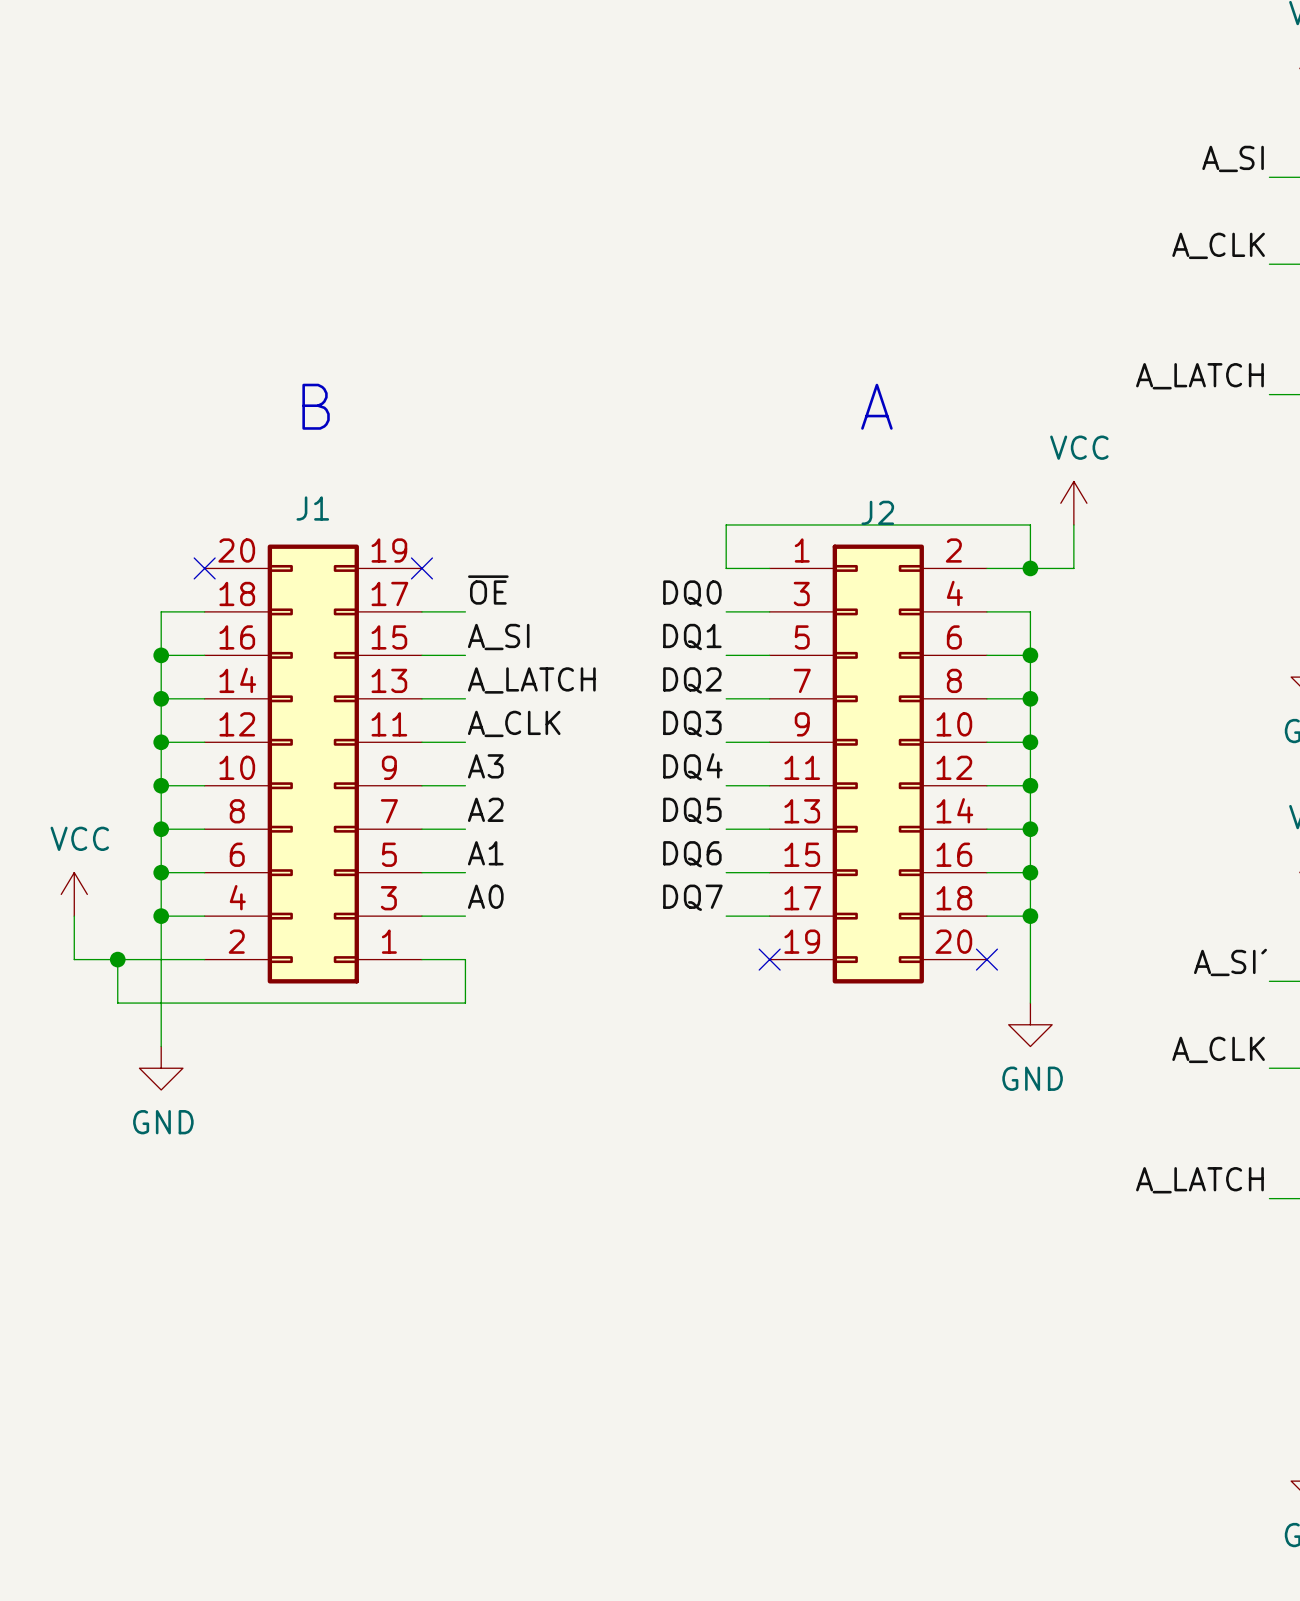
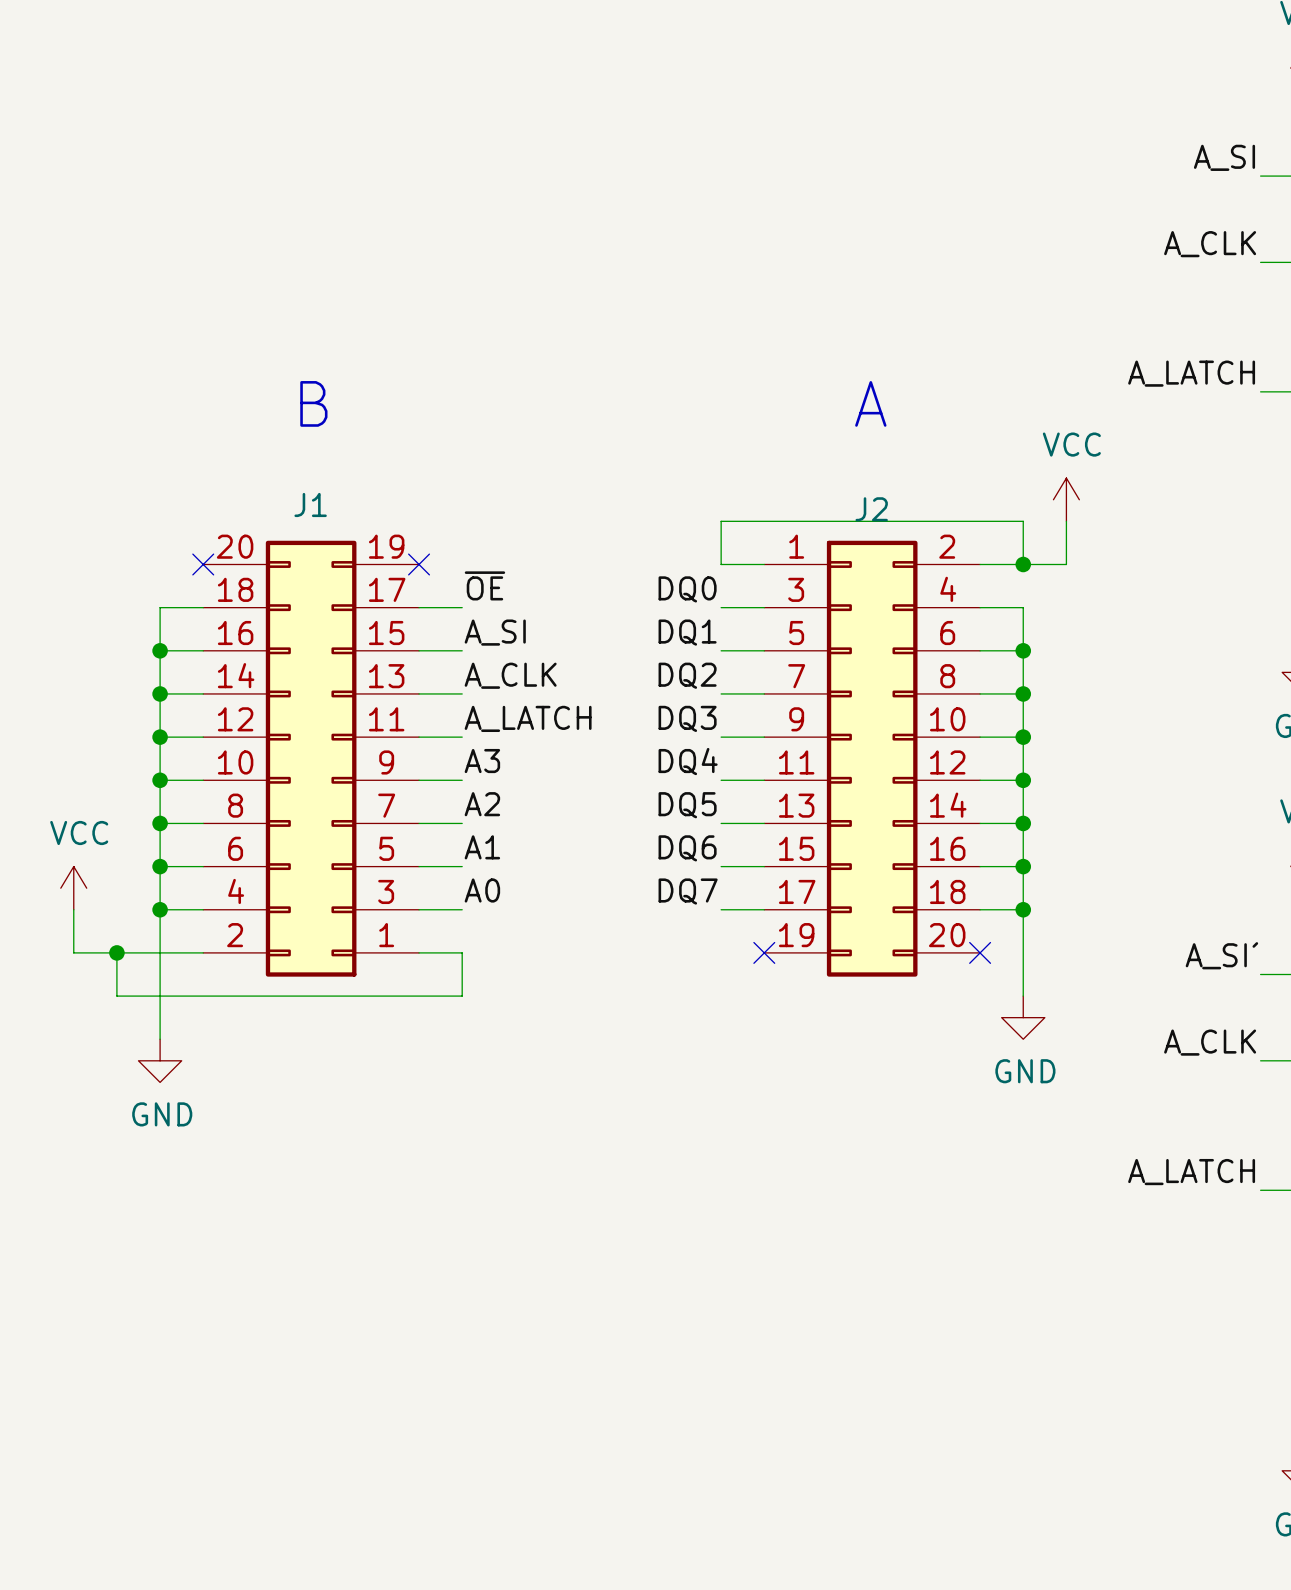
label: A_LATCH (531, 680) -> A_CLK (510, 675)
label: A_CLK (514, 723) -> A_LATCH (528, 718)

